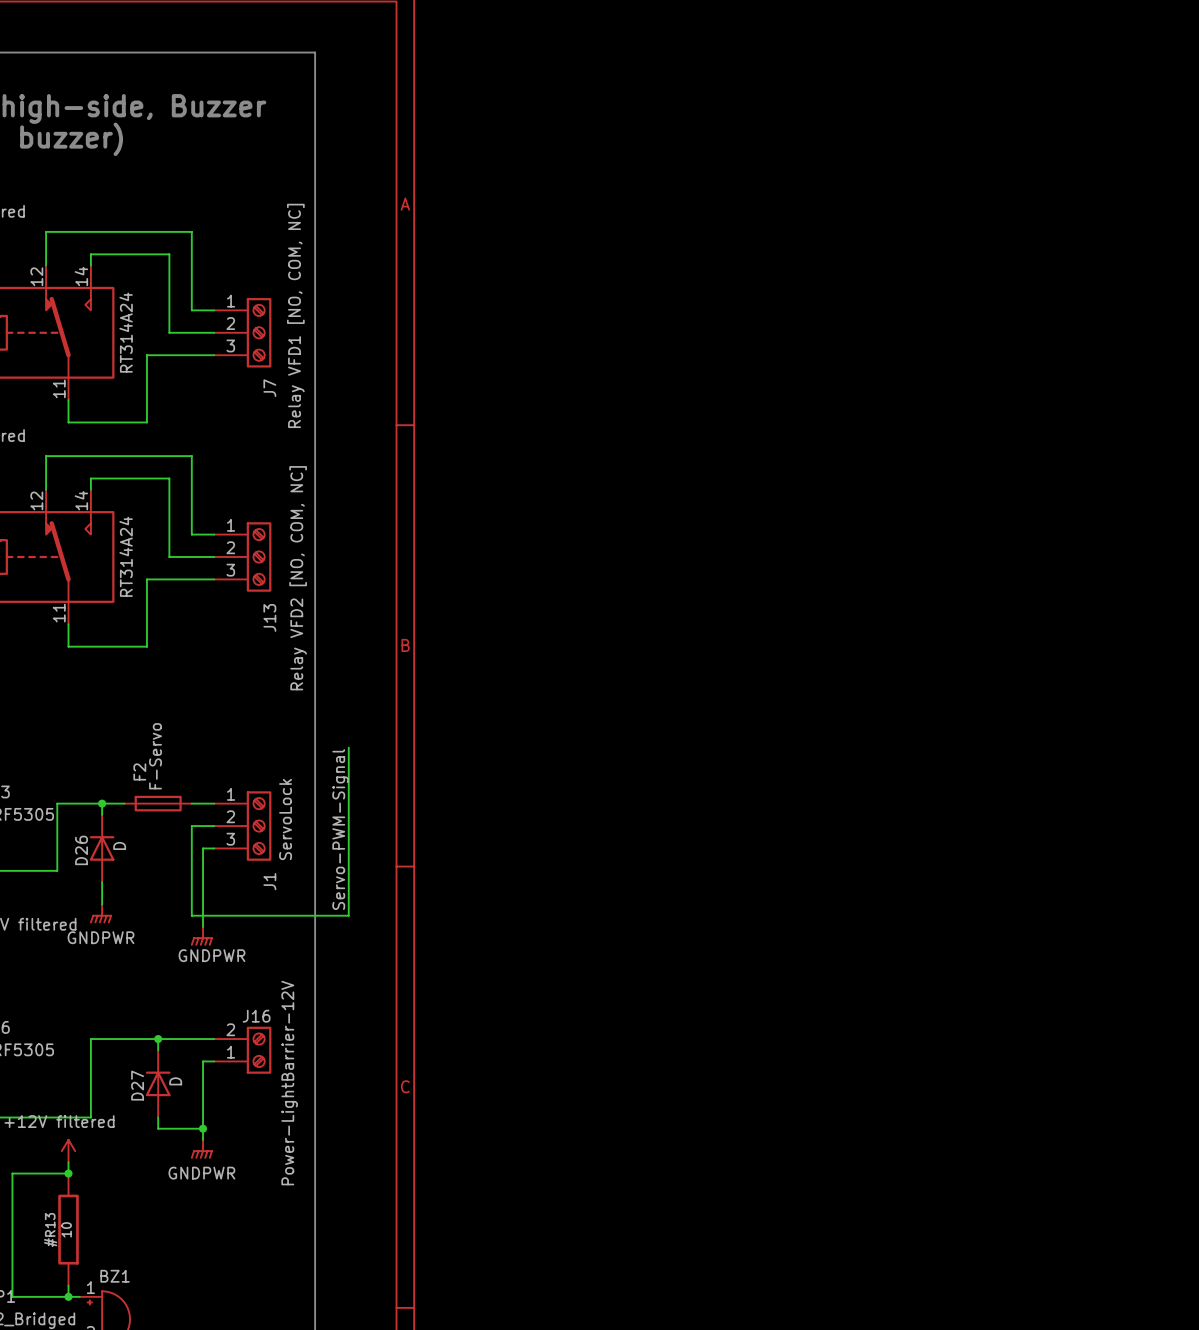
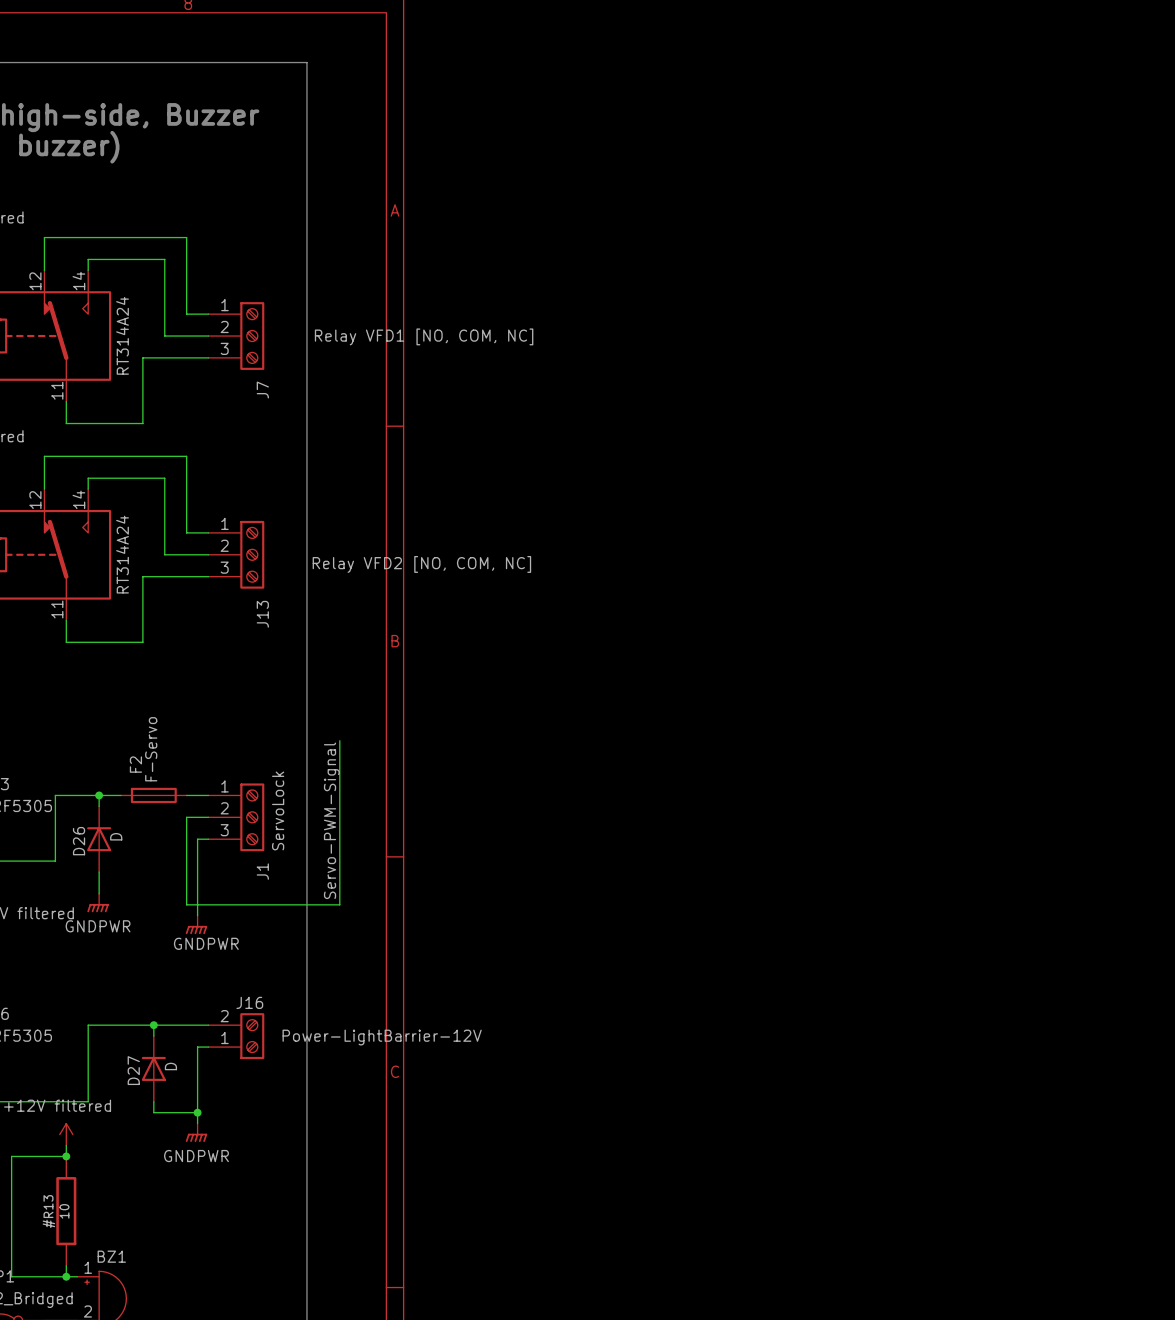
J7 value rotation: 0° (295, 315) -> 90° clockwise (424, 336)
J13 value rotation: 0° (298, 578) -> 90° clockwise (421, 564)
J16 value rotation: 0° (289, 1083) -> 90° clockwise (382, 1037)

